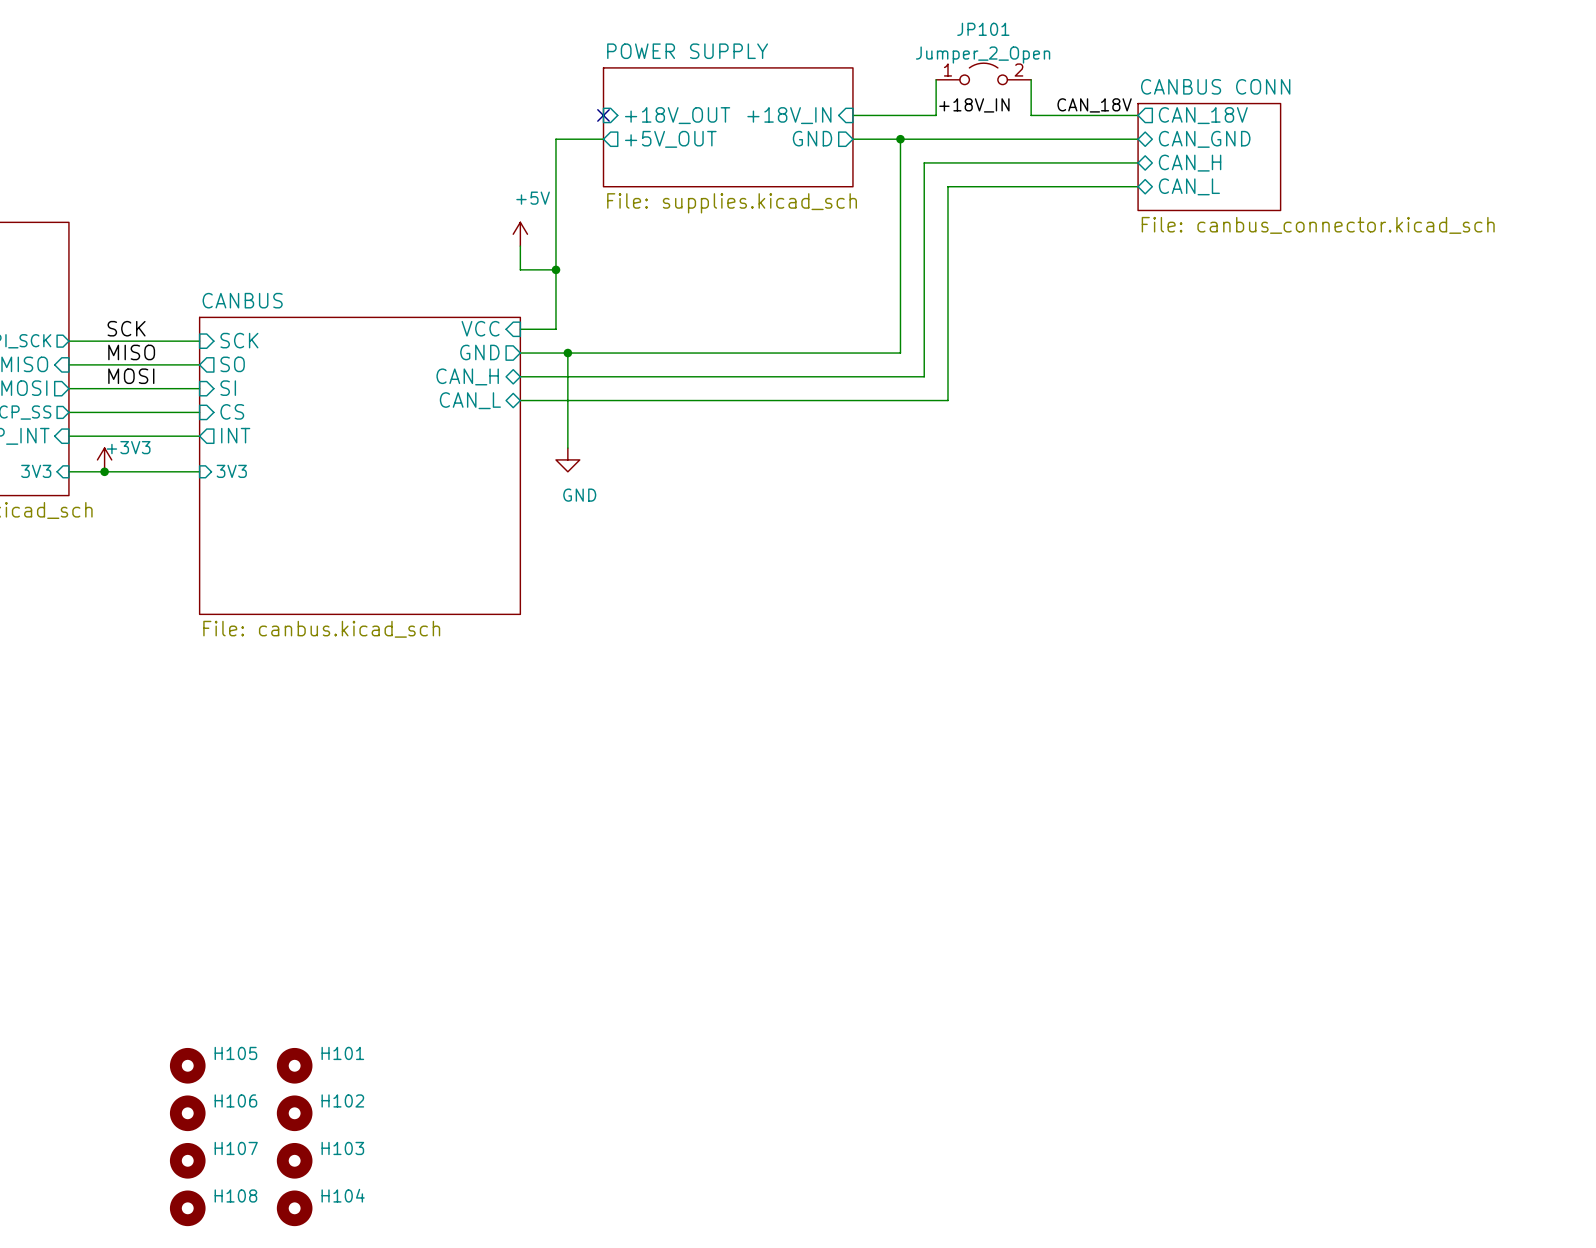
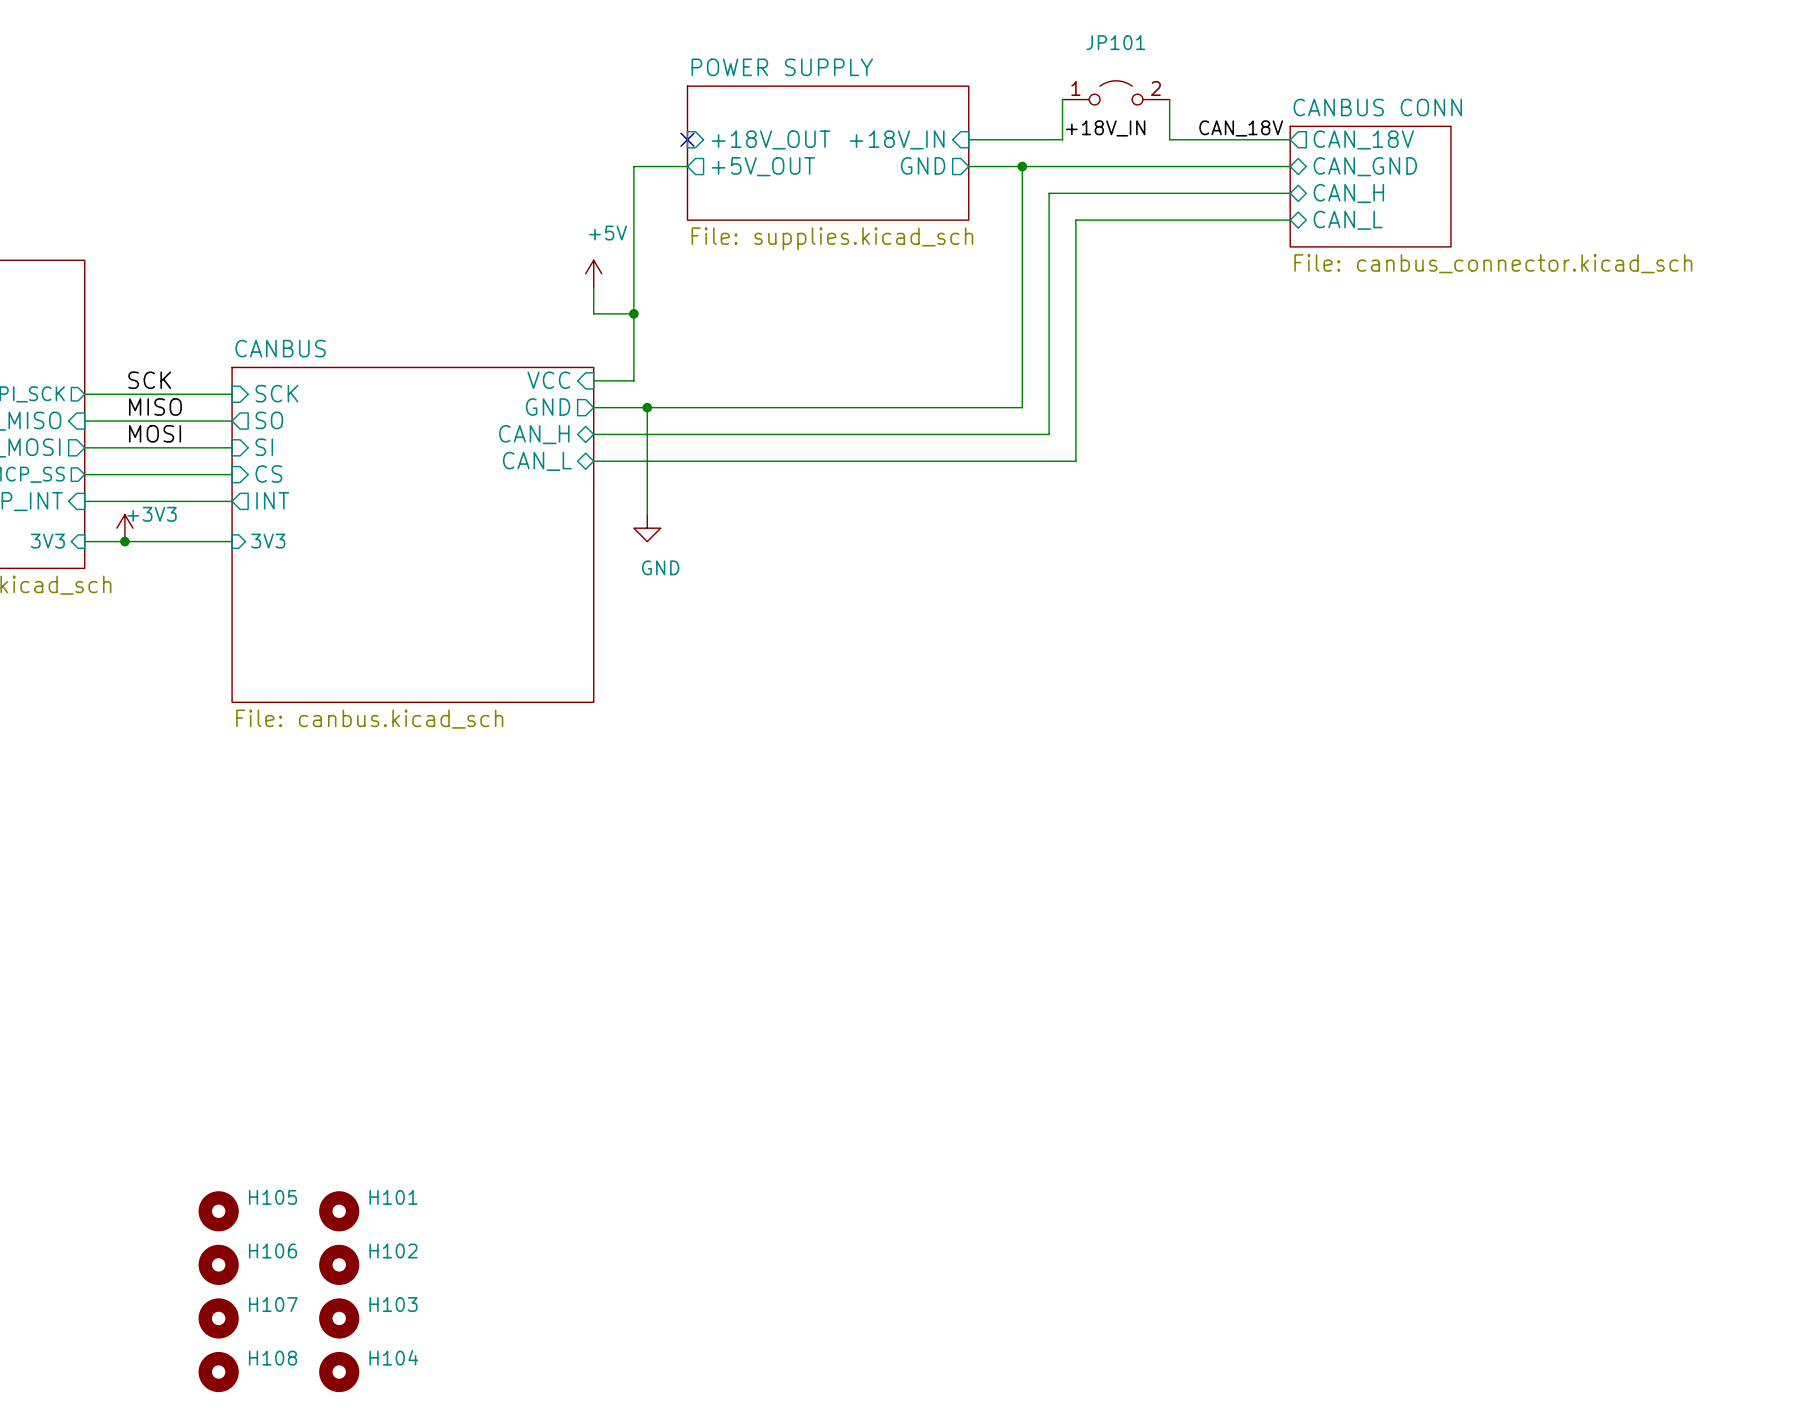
JP101 value: Jumper_2_Open (983, 55) -> none

